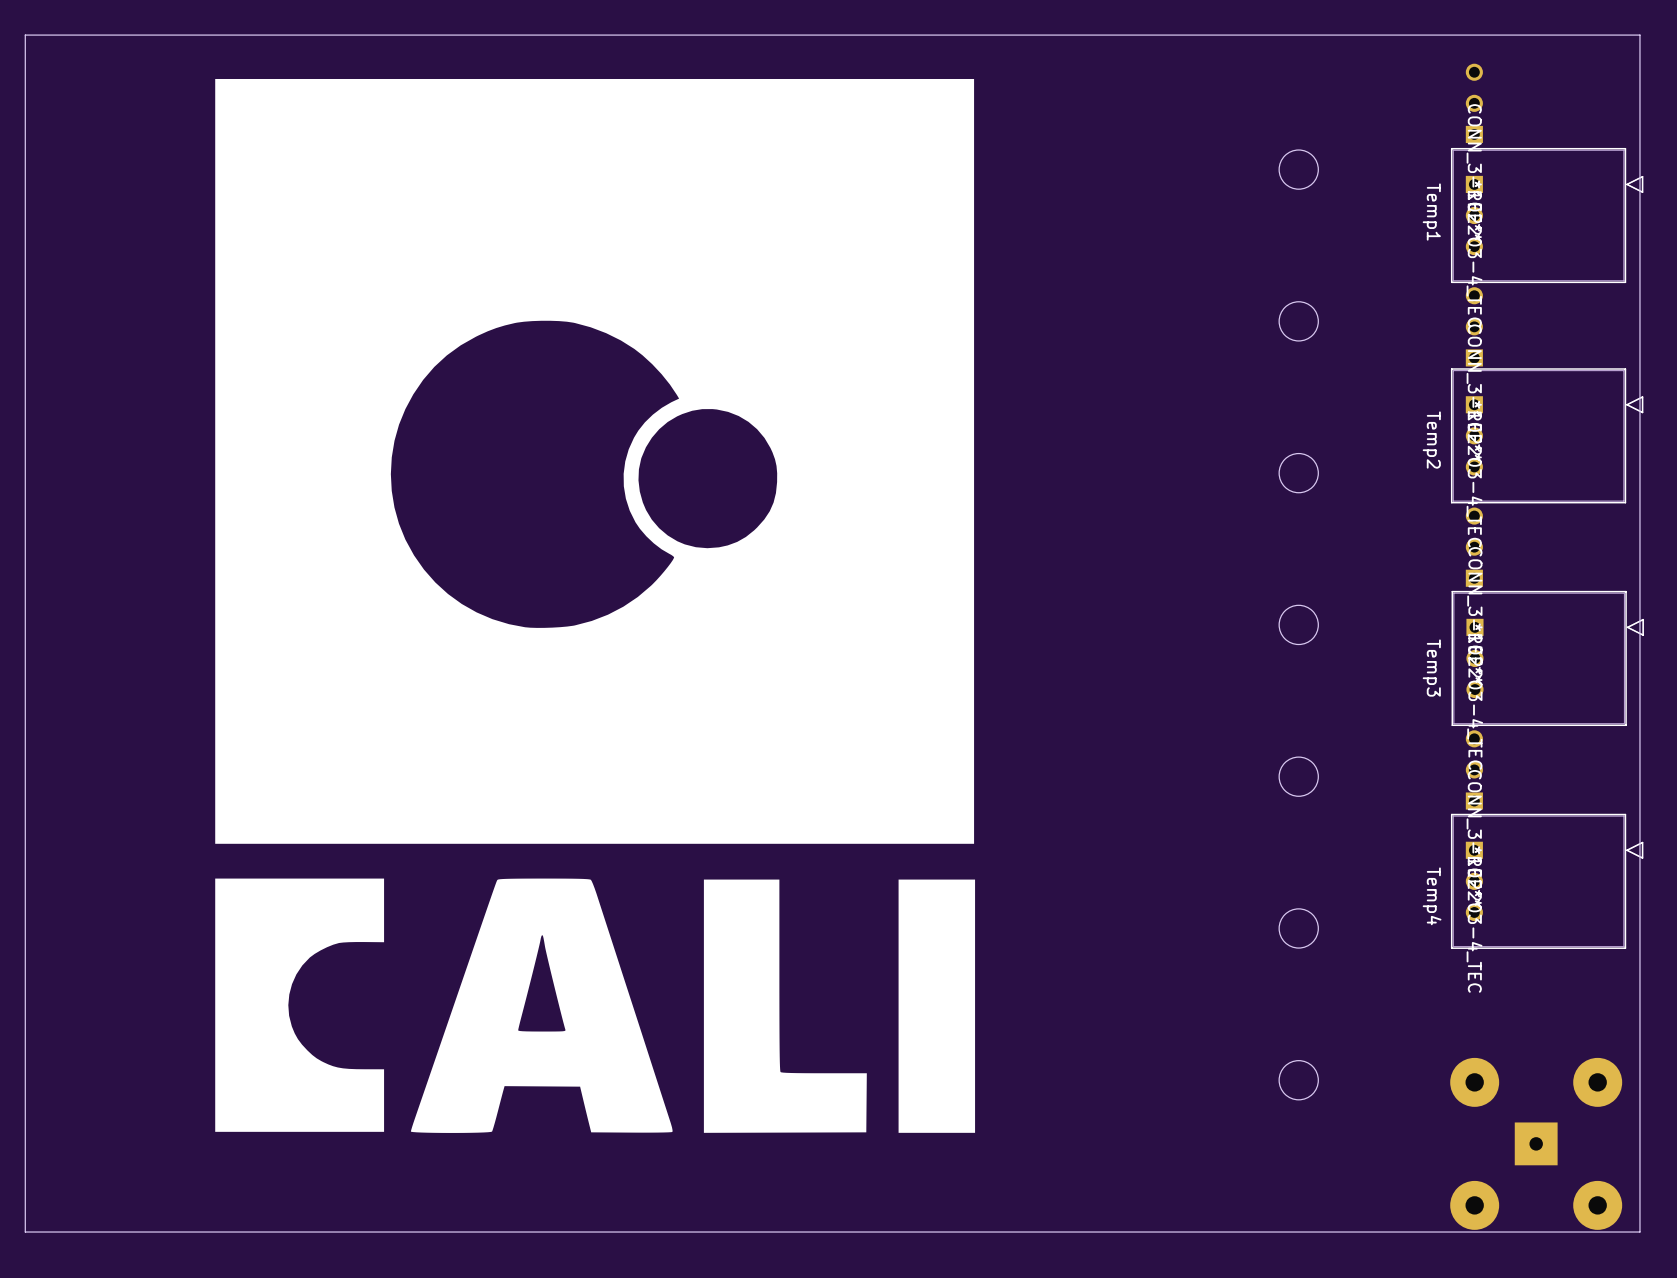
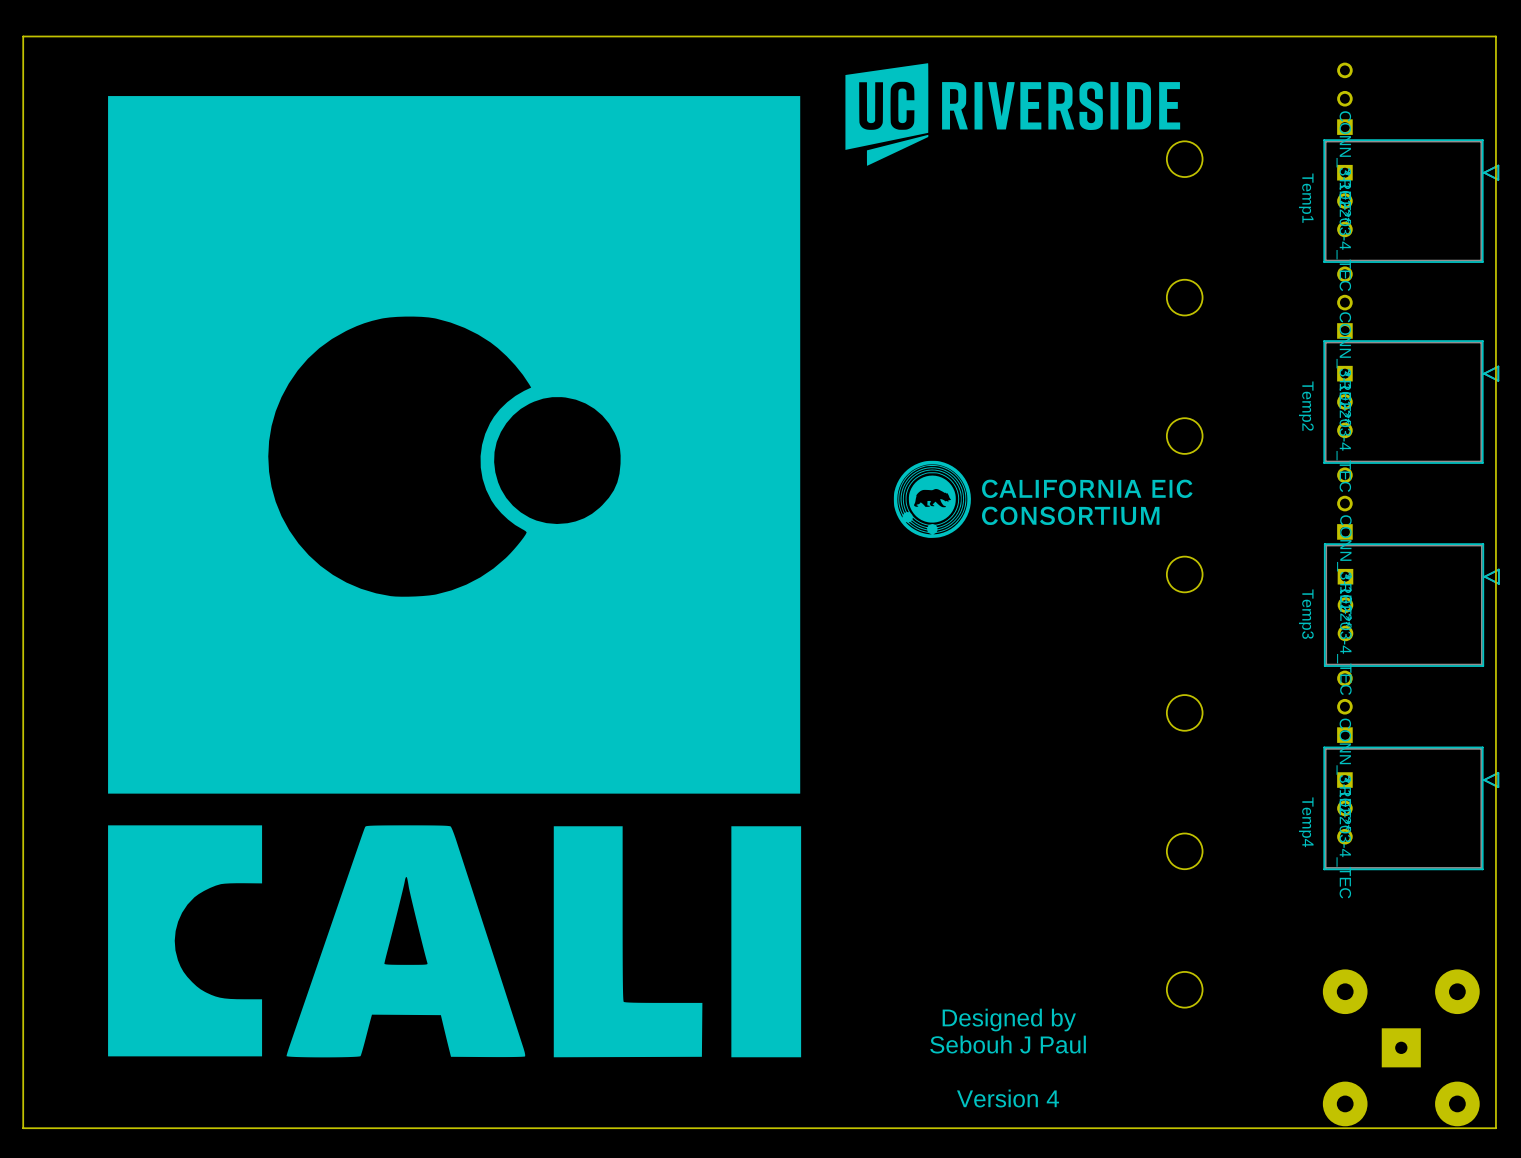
drawing: none -> [845, 63, 1181, 166]
drawing: none -> [893, 460, 1193, 538]
drawing position: (595, 605) -> (454, 576)
text: none -> Designed by (1009, 1020)
text: none -> Sebouh J Paul (1008, 1044)
text: none -> Version 4 (1008, 1098)

